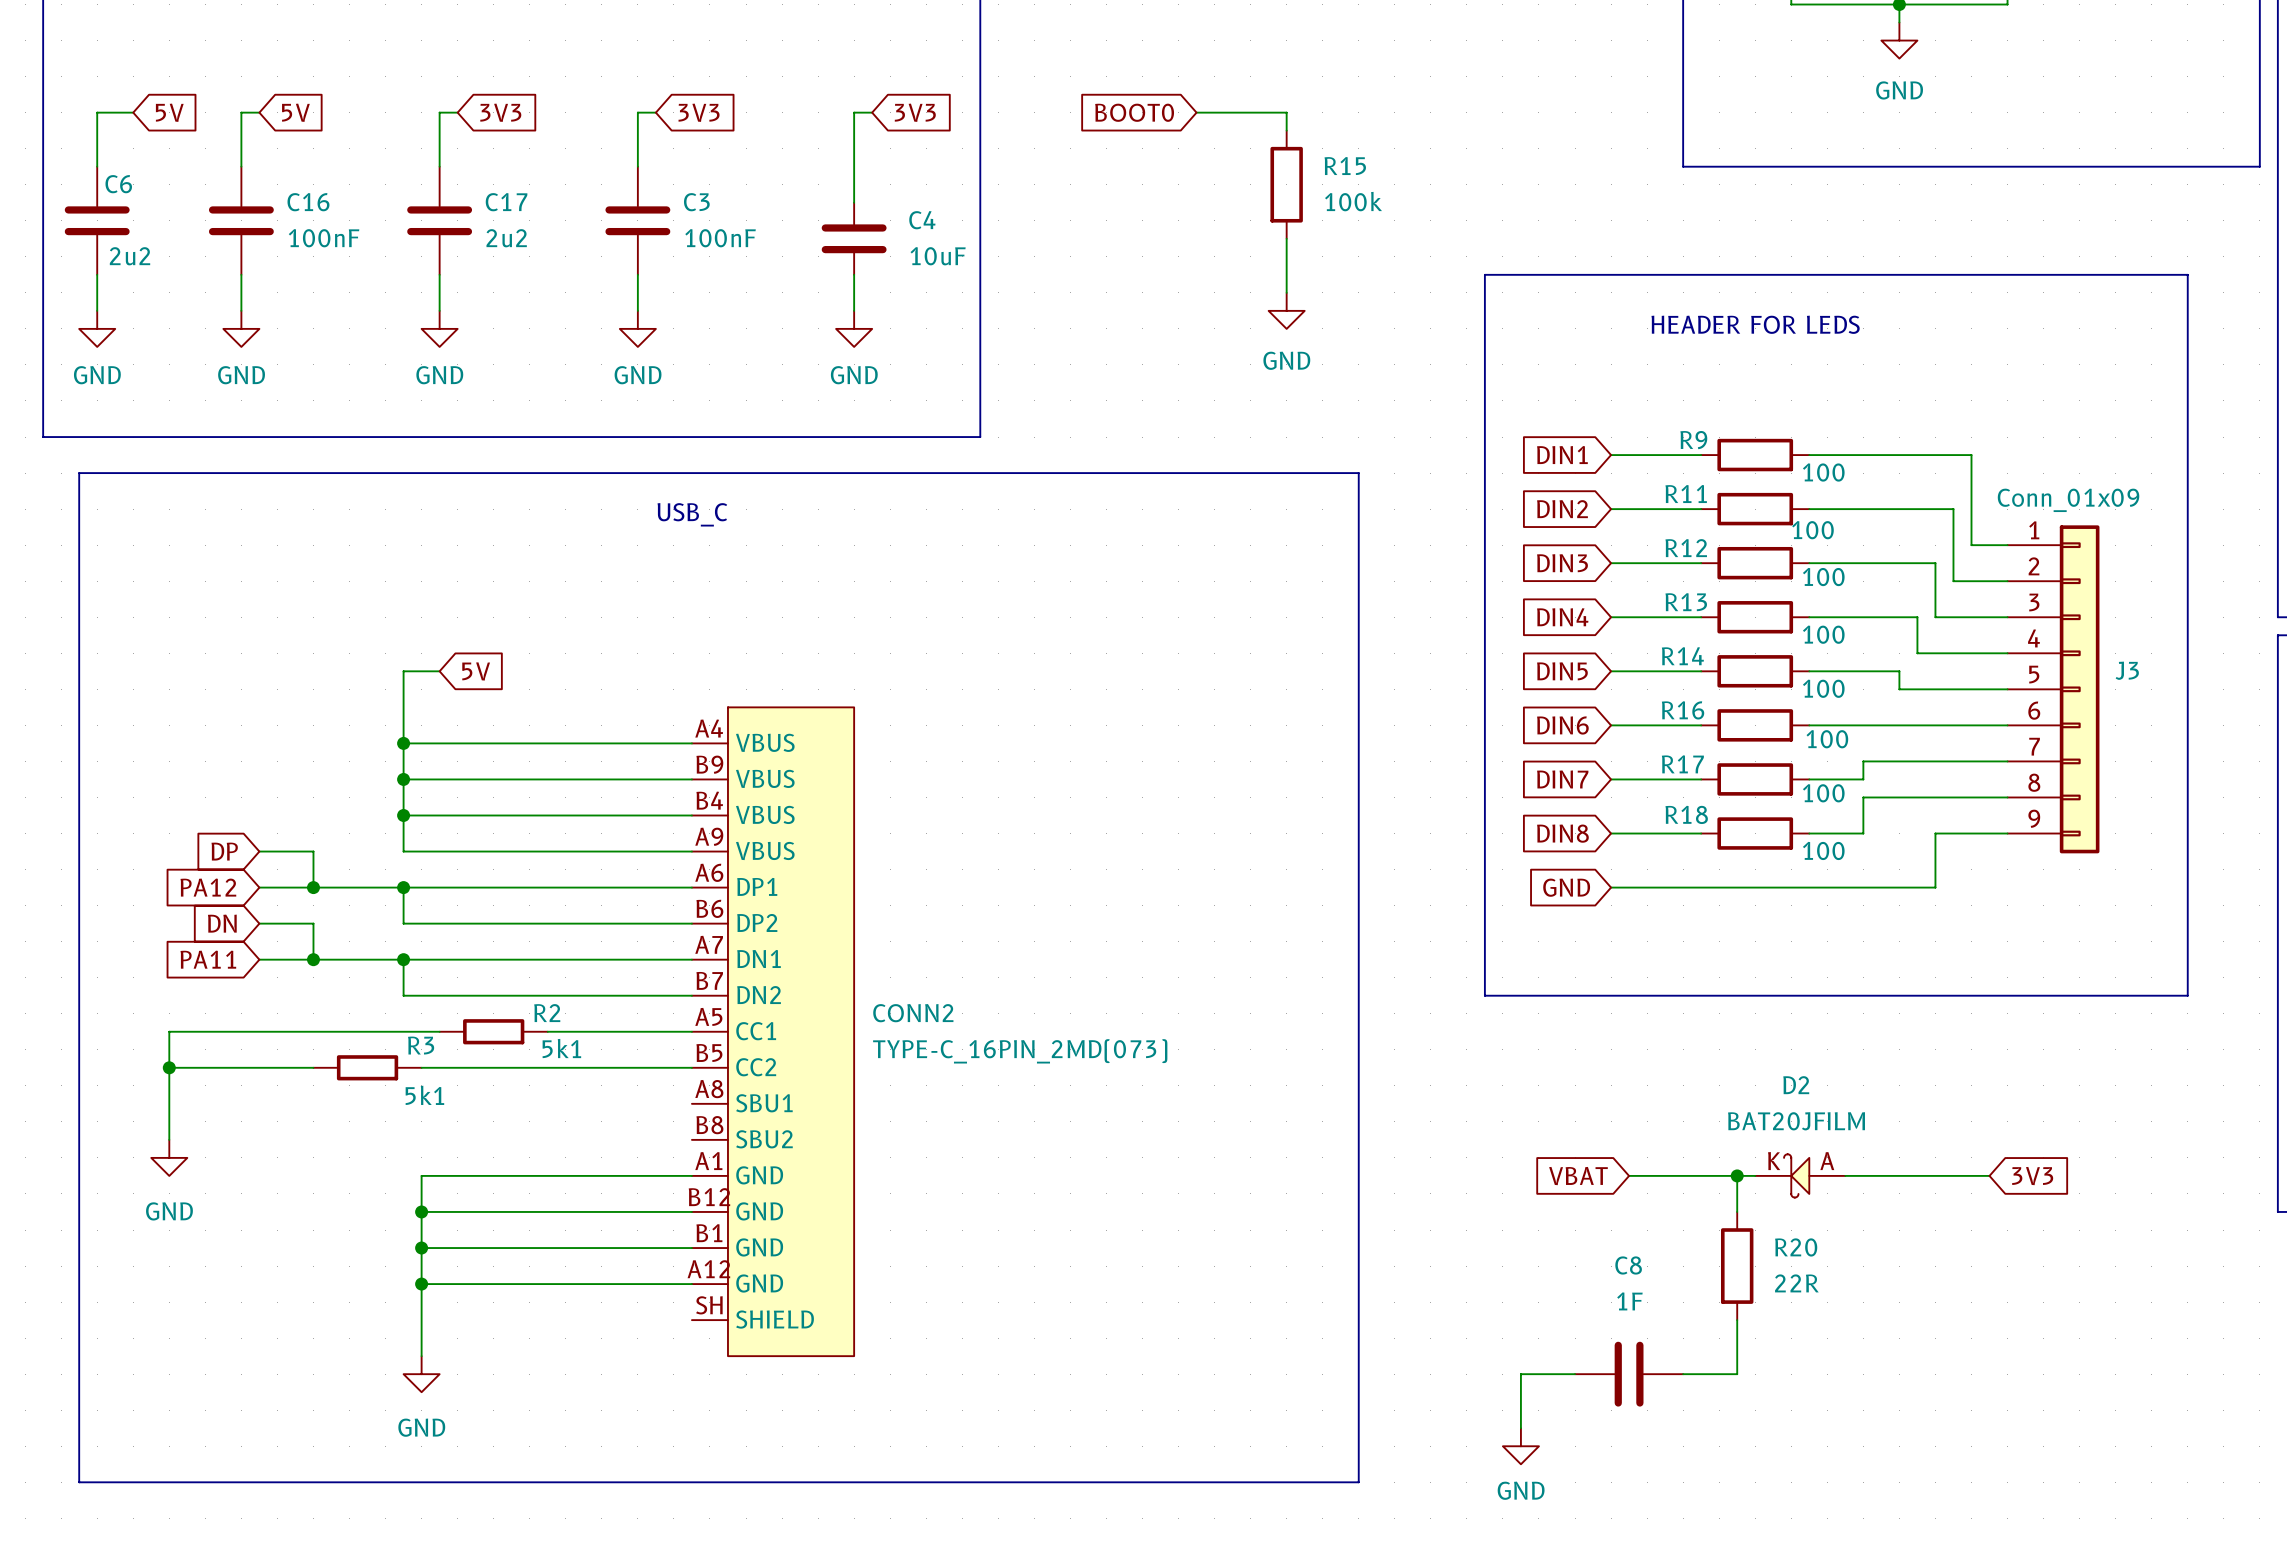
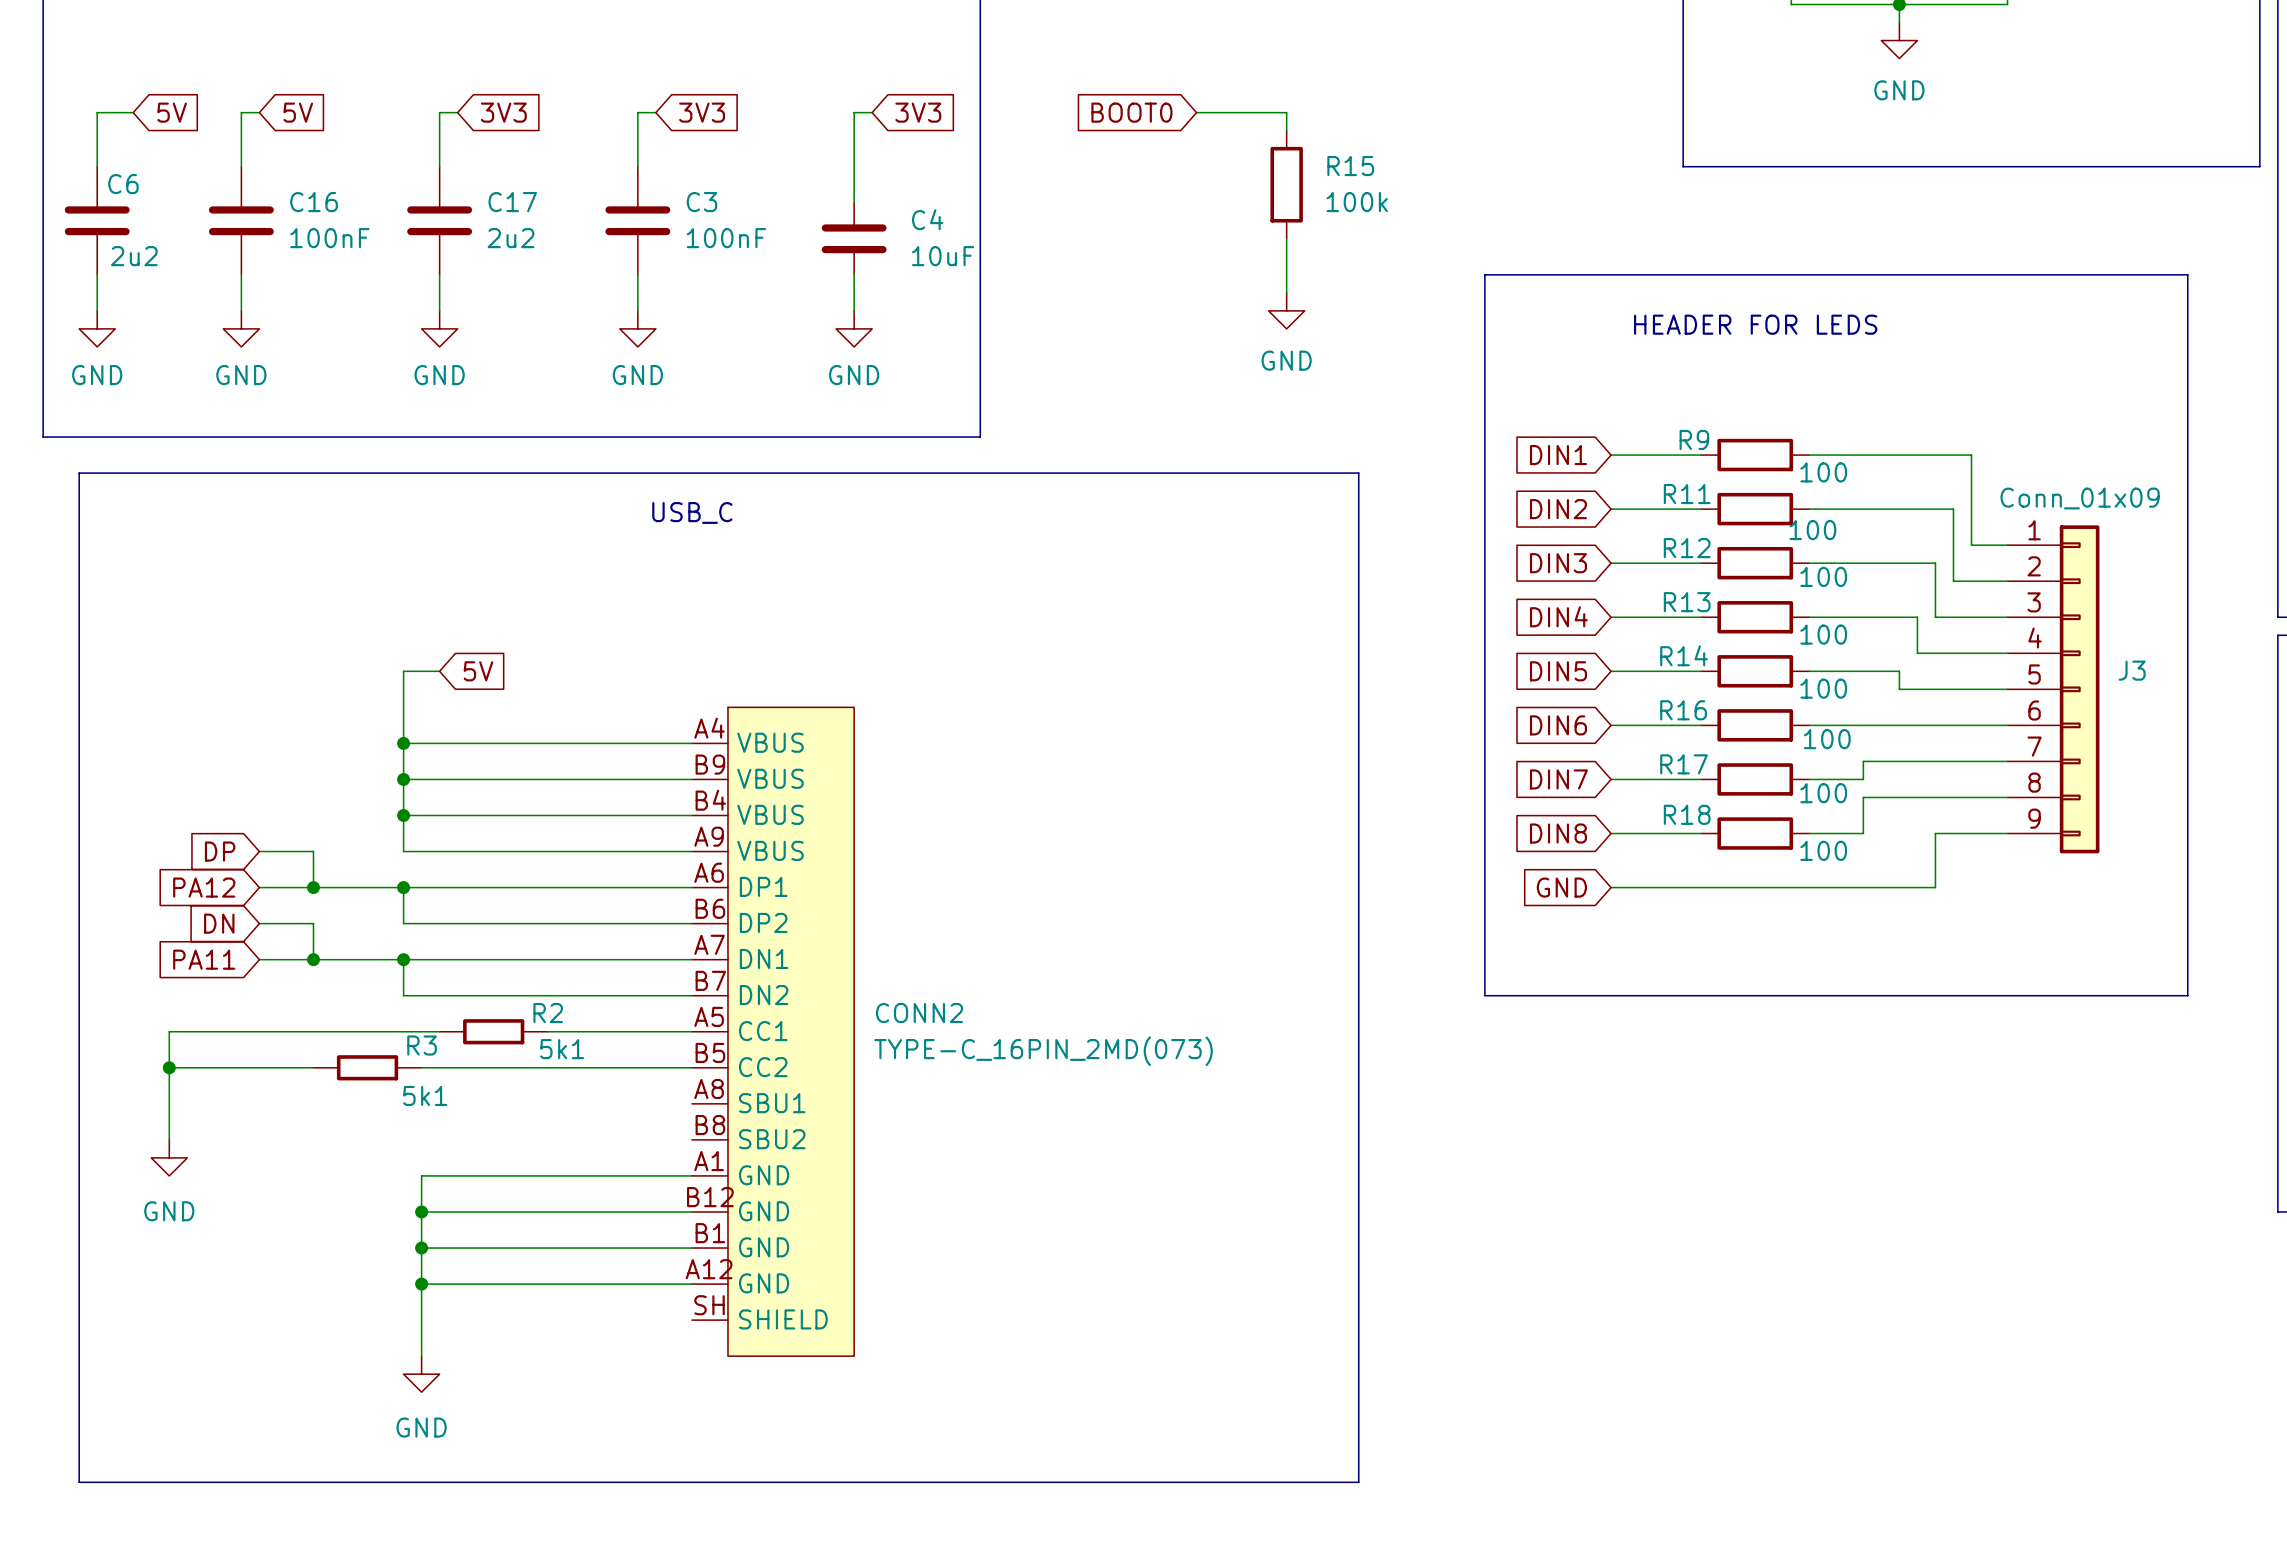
wire: (1629, 1175) (1755, 1175) -> none
wire: (1737, 1175) (1737, 1211) -> none
junction: (1737, 1175) -> none
D2: BAT20JFILM (1800, 1175) -> none
wire: (1845, 1175) (1989, 1175) -> none
global label: VBAT (1578, 1176) -> none
global label: 3V3 (2032, 1176) -> none
R20: 22R (1737, 1266) -> none
wire: (1737, 1320) (1737, 1374) (1683, 1374) -> none
wire: (1575, 1374) (1520, 1374) (1520, 1428) -> none
C8: 1F (1629, 1374) -> none
power symbol: GND (1520, 1446) -> none

